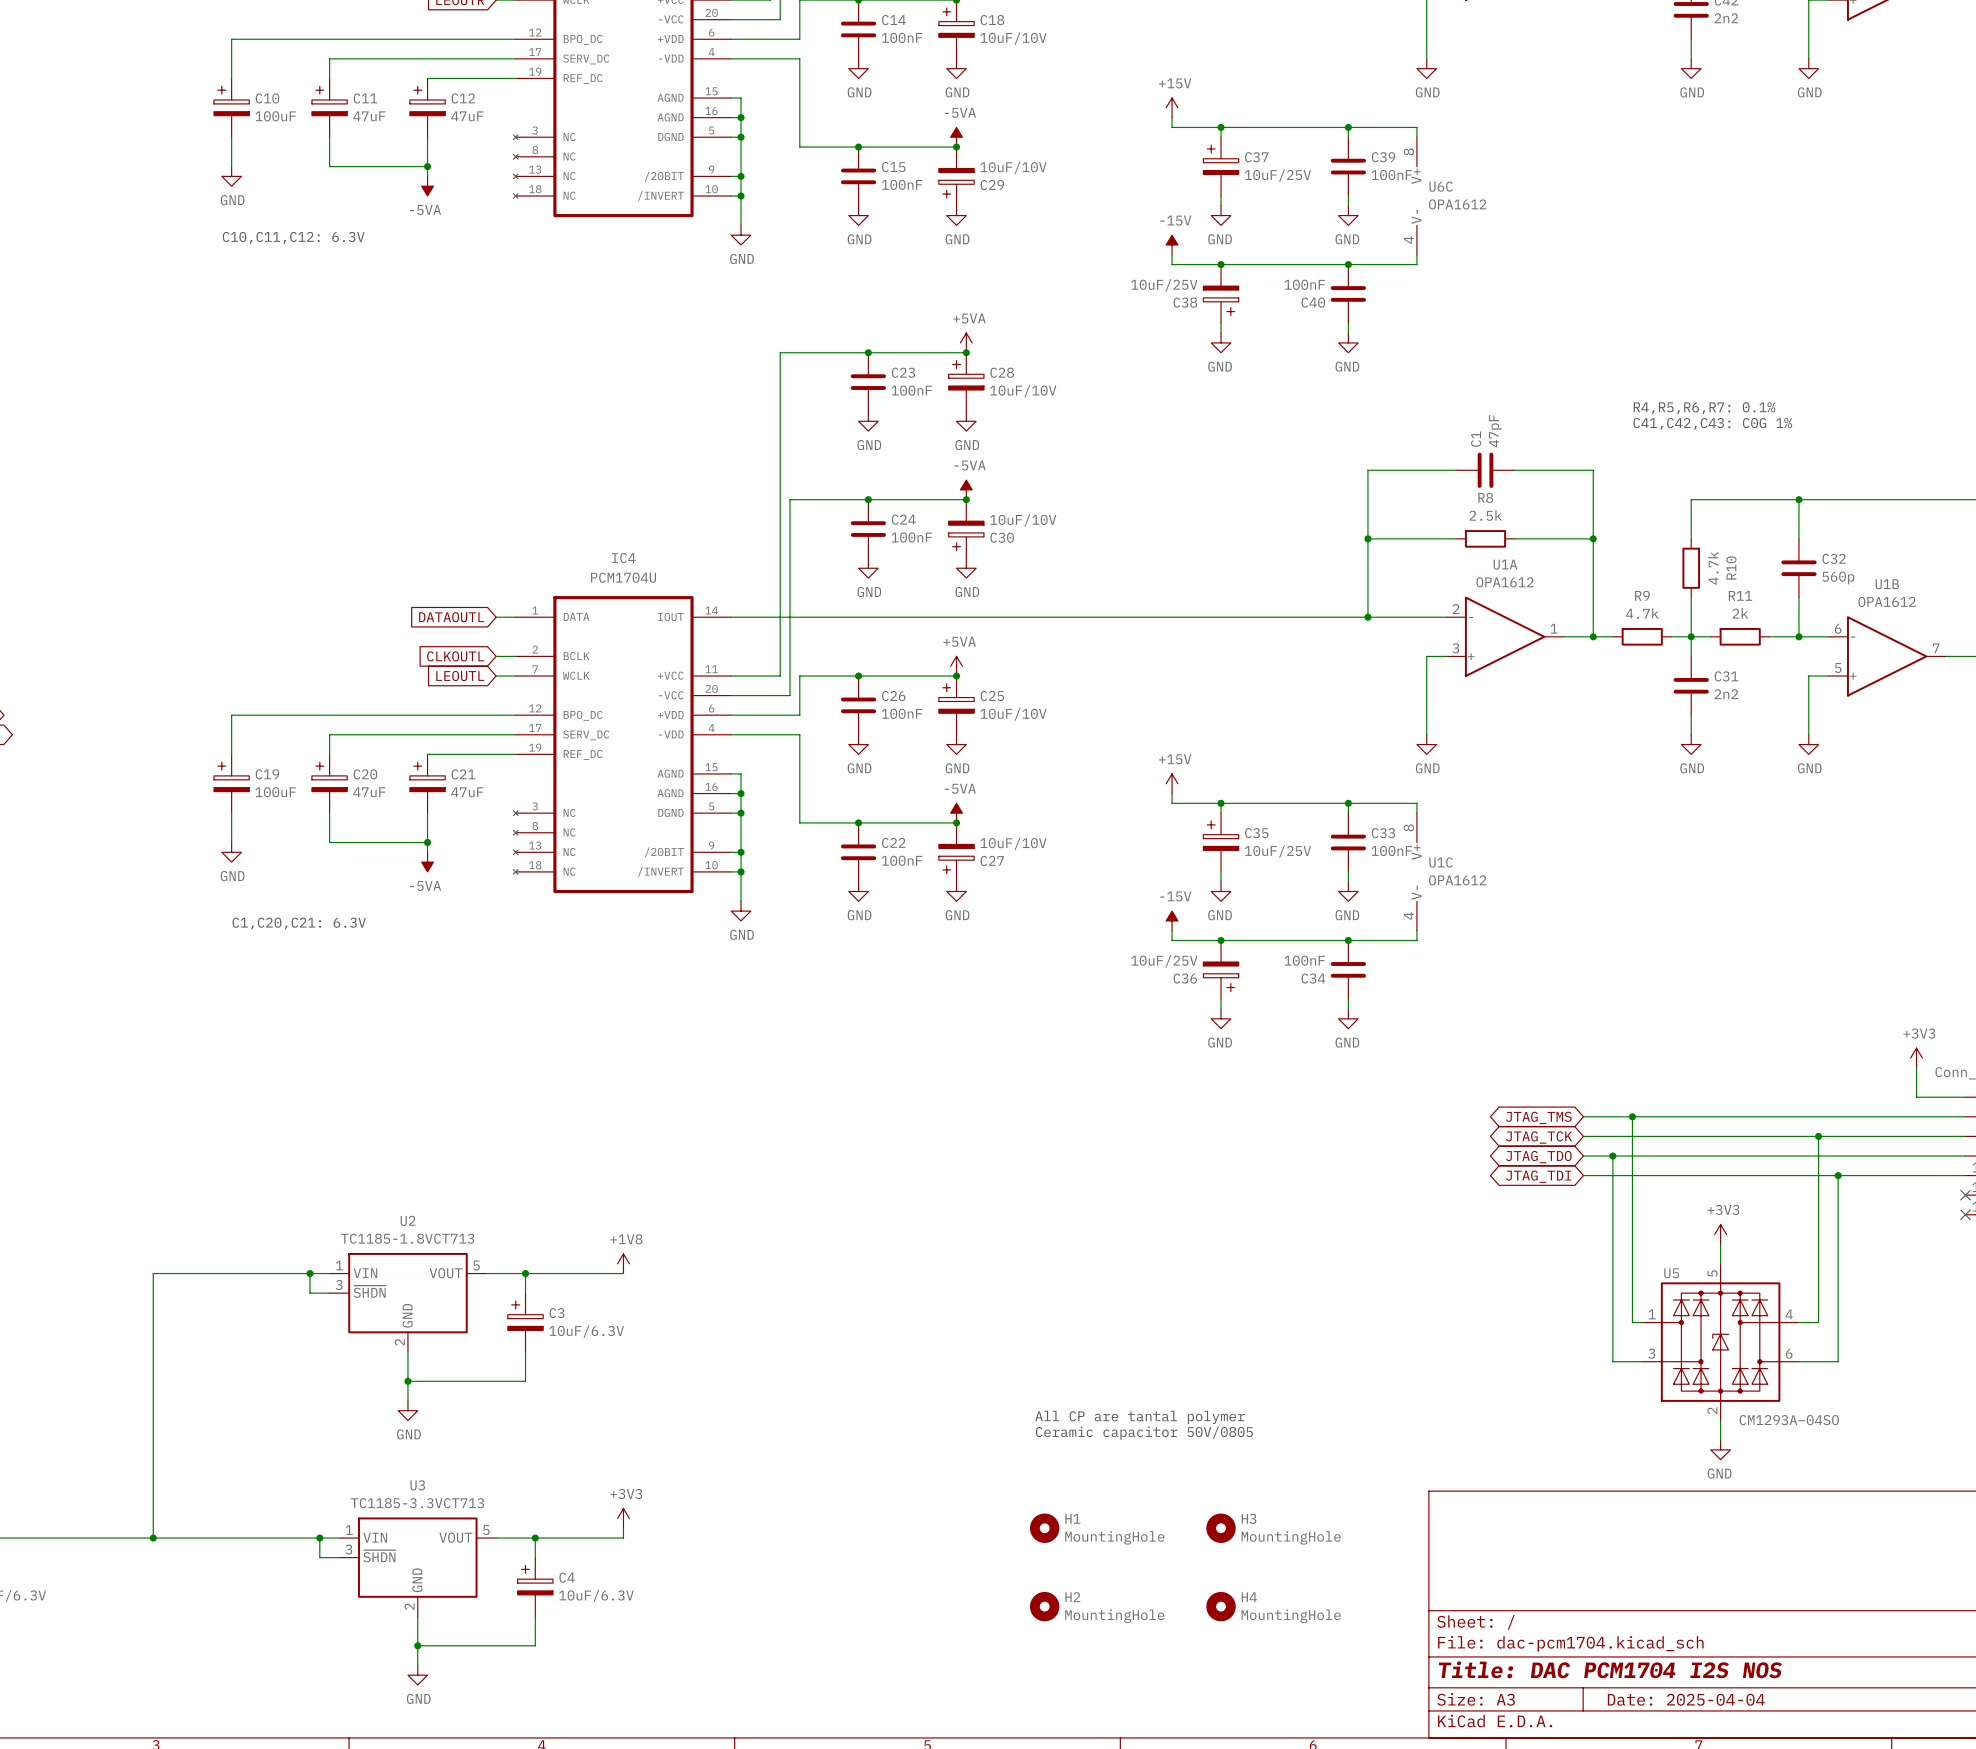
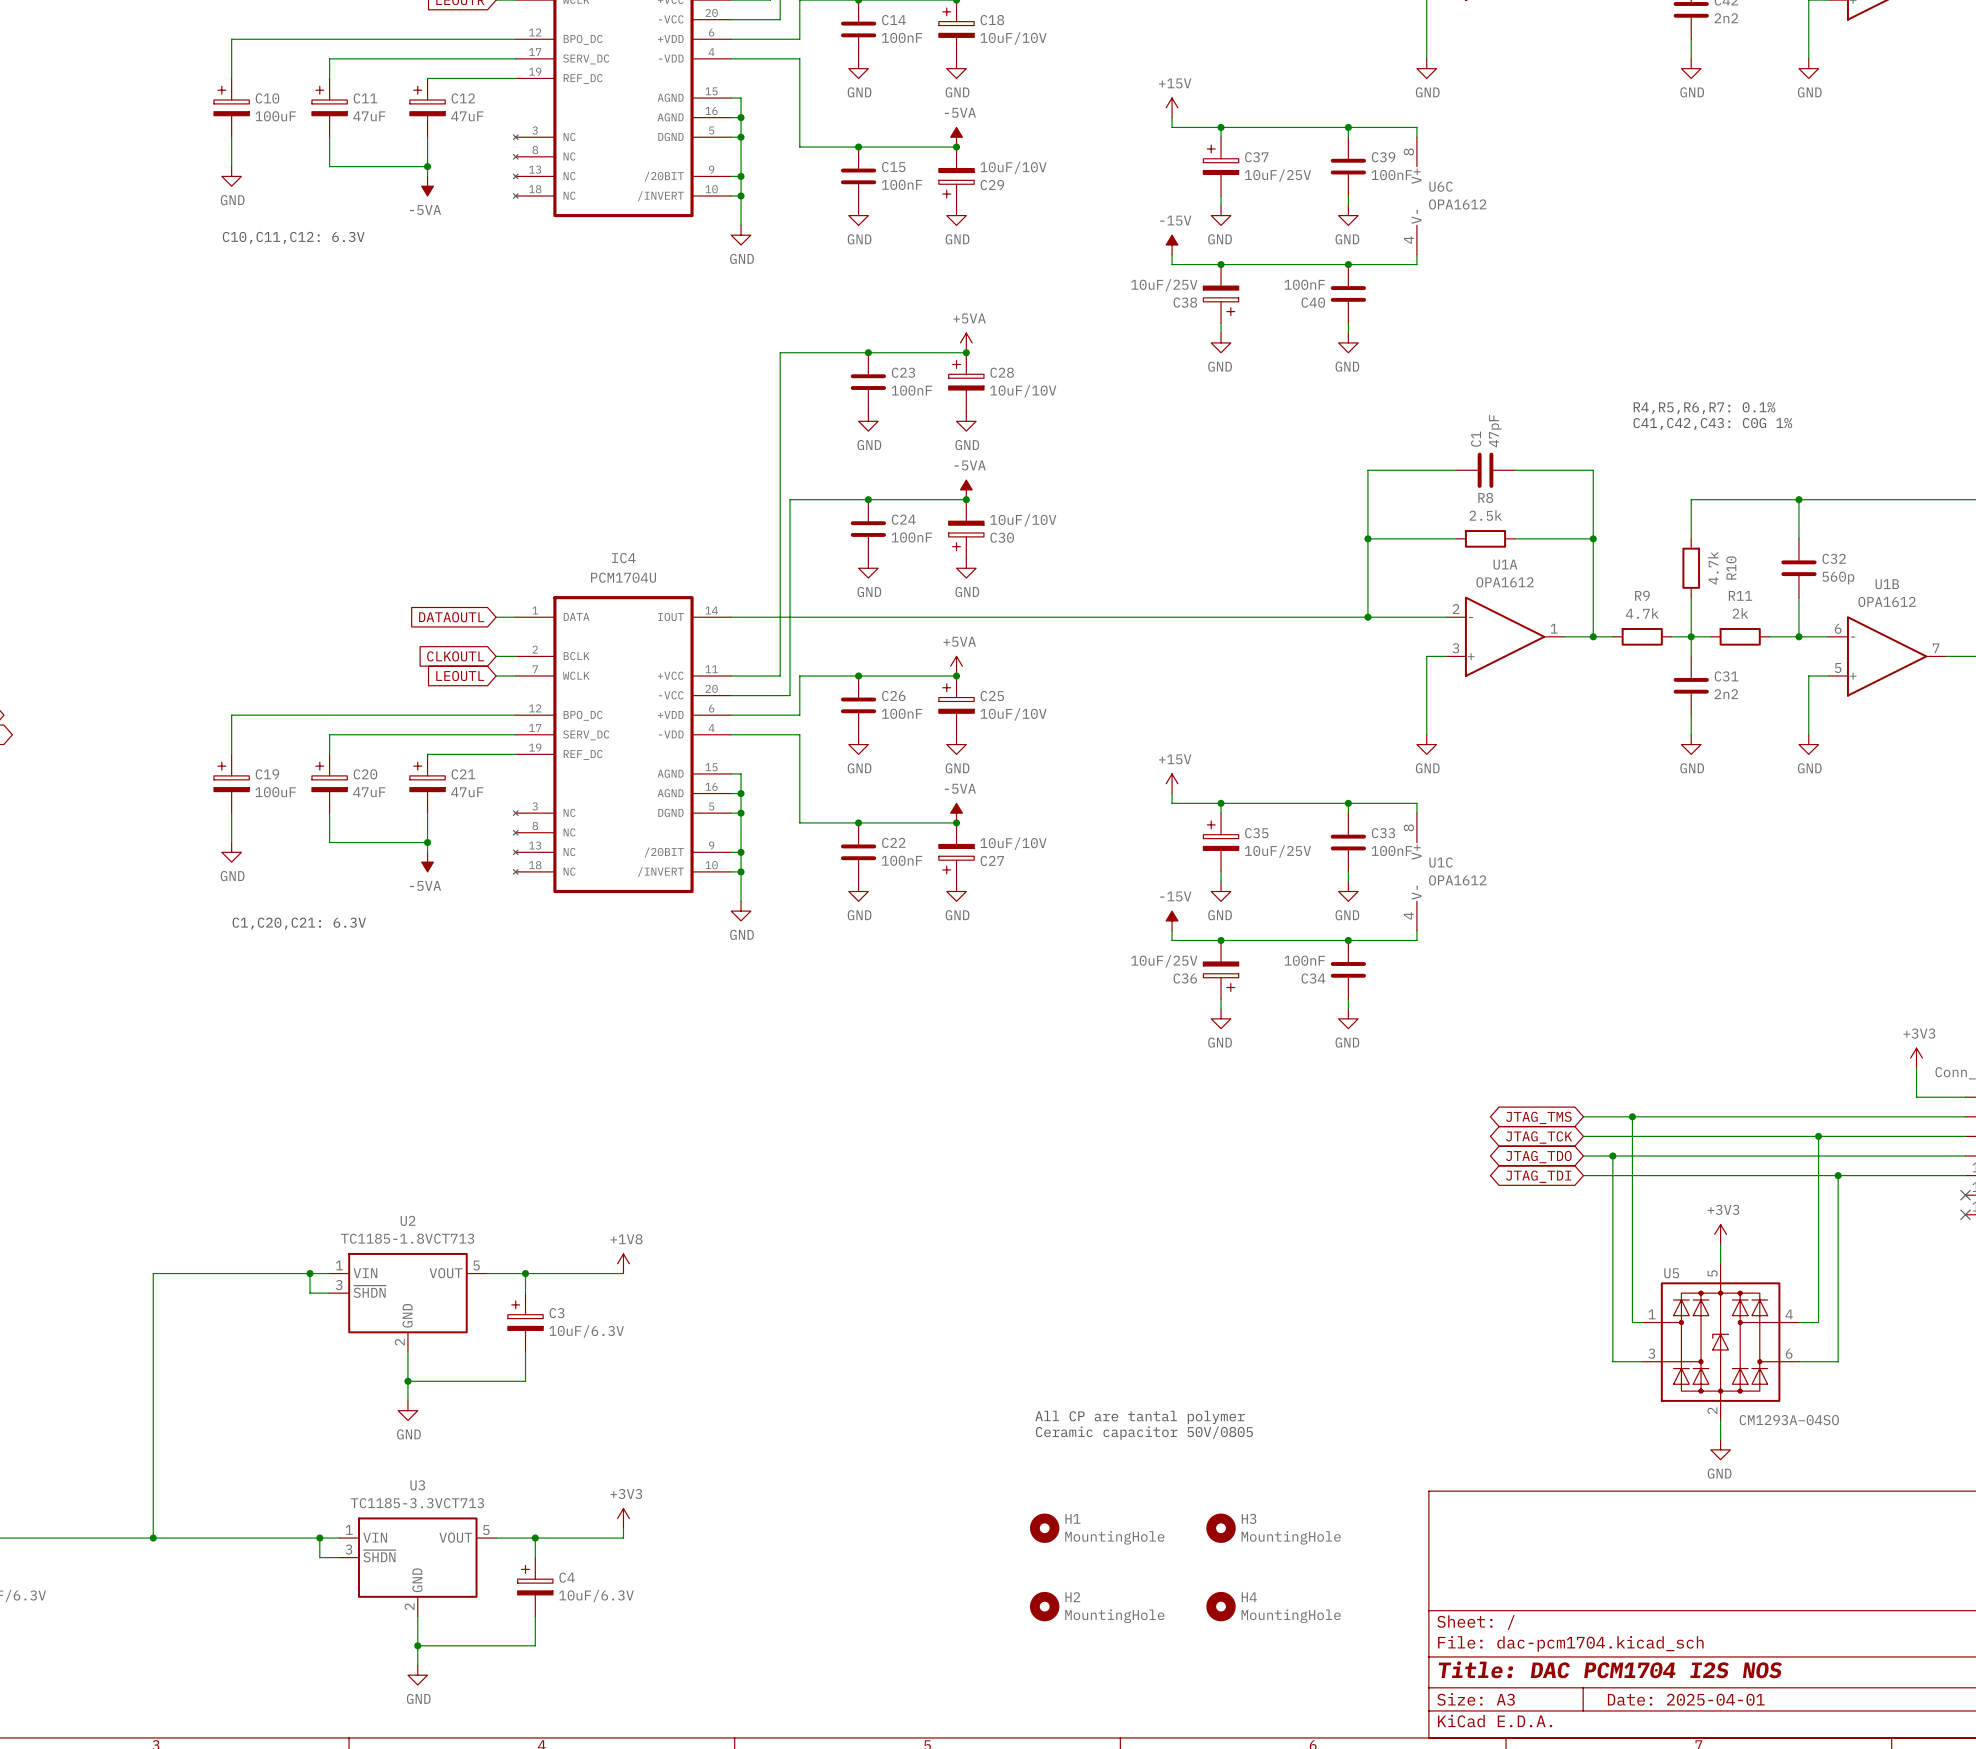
title block: Date: 2025-04-04 (1686, 1699) -> Date: 2025-04-01 (1686, 1699)

